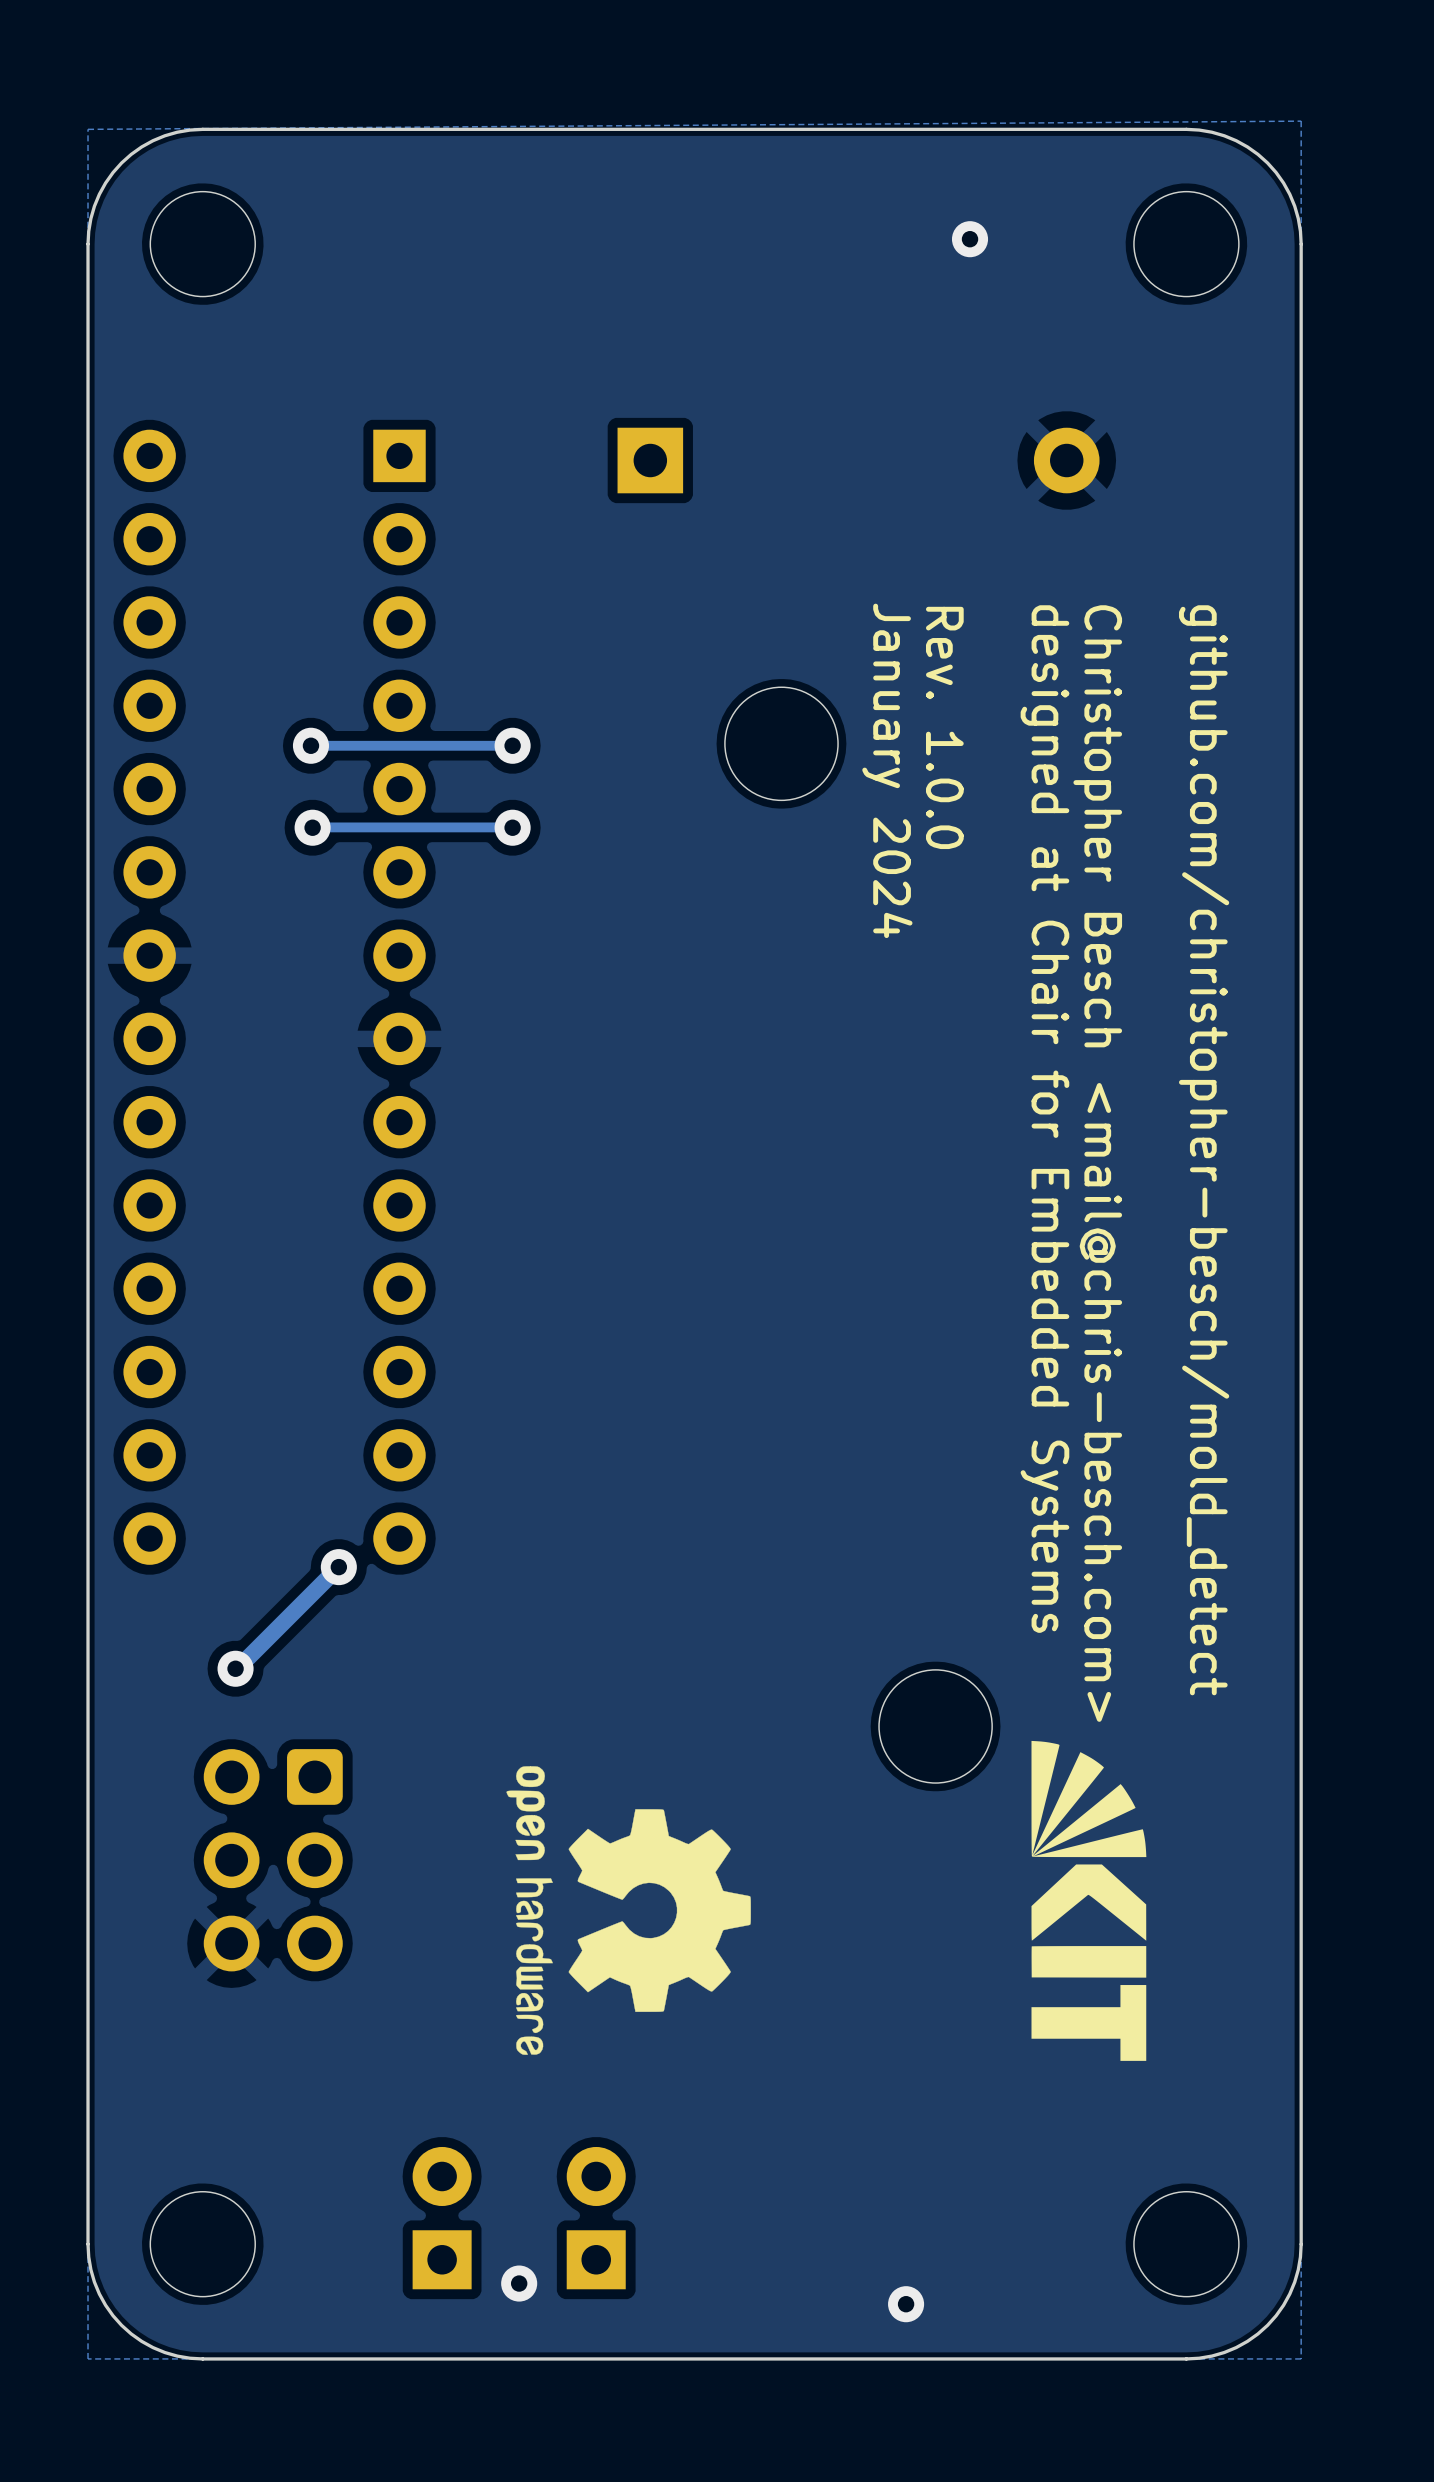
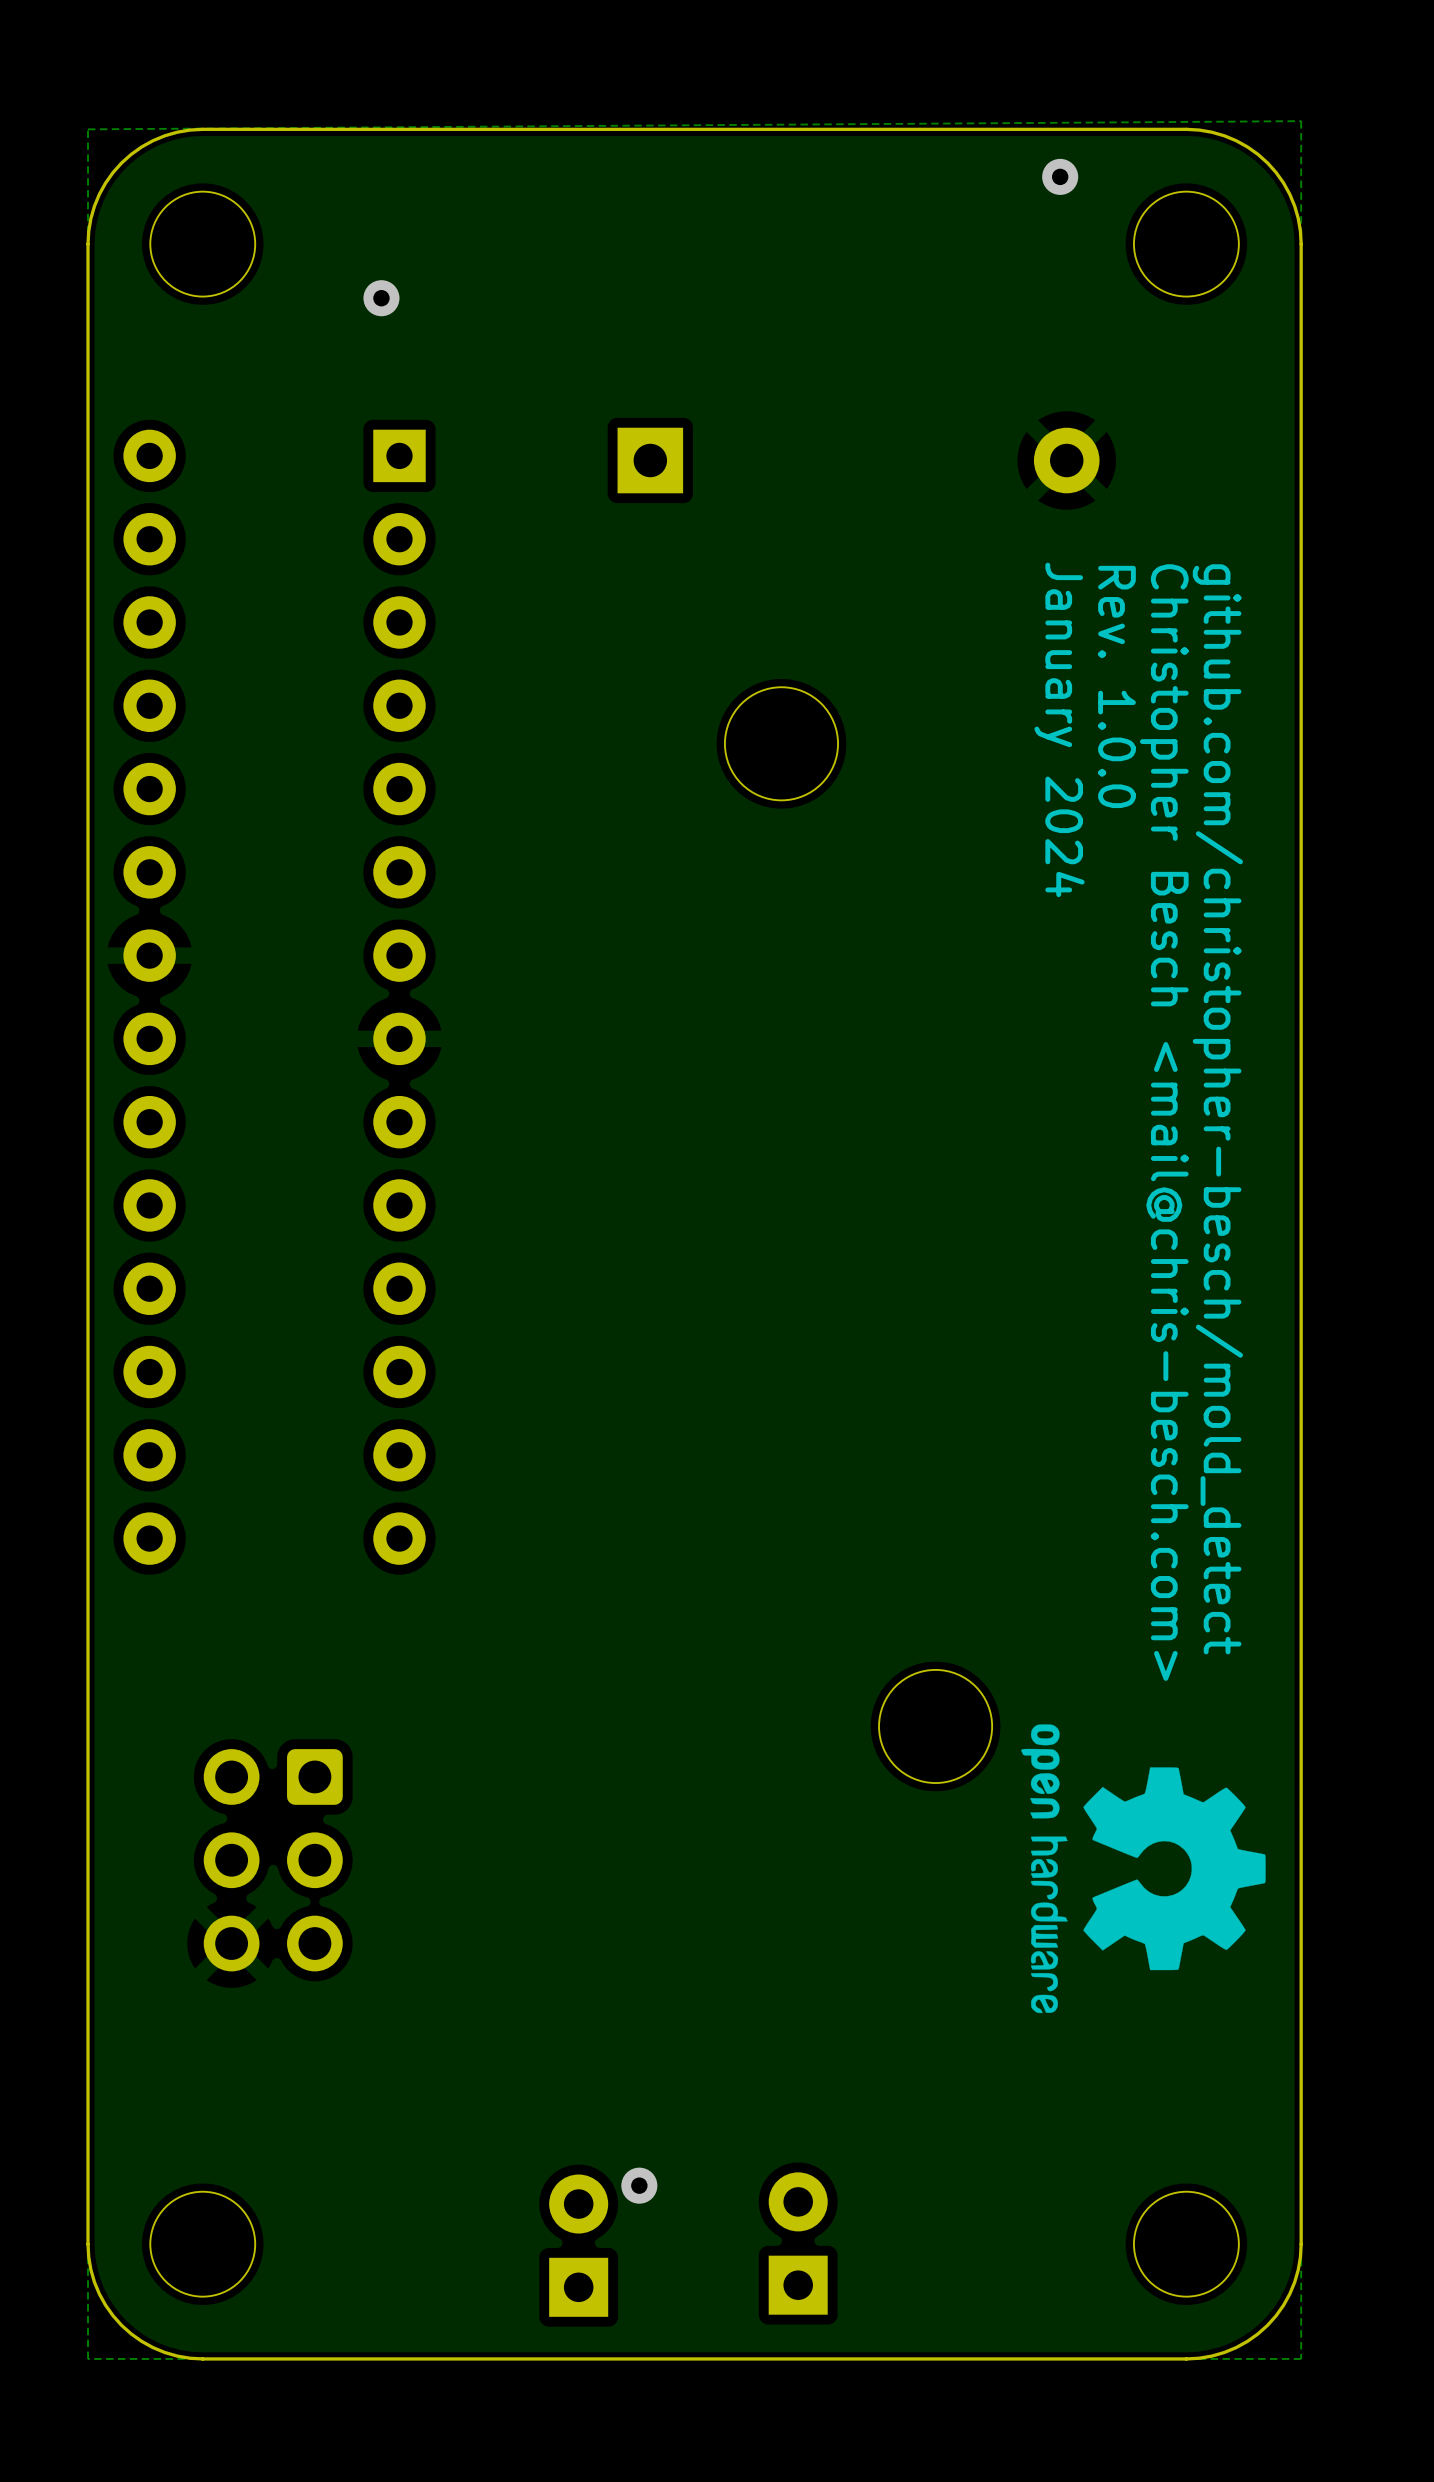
via position: (970, 239) -> (1060, 176)
via: none -> (381, 298)
text position: Rev. 1.0.0 (944, 727) -> Rev. 1.0.0 (1116, 686)
via: (310, 745) -> none
track: (512, 745) (310, 745) -> none
via: (512, 745) -> none
text position: January 2024 (887, 770) -> January 2024 (1059, 729)
via: (312, 827) -> none
track: (512, 827) (312, 827) -> none
via: (512, 827) -> none
text: designed at Chair for Embedded Systems (1044, 1119) -> none
text position: github.com/christopher-besch/mold_detect (1204, 1150) -> github.com/christopher-besch/mold_detect (1217, 1109)
text position: Christopher Besch <mail@chris-besch.com> (1097, 1163) -> Christopher Besch <mail@chris-besch.com> (1164, 1122)
track: (338, 1567) (235, 1668) -> none
via: (338, 1567) -> none
via: (235, 1668) -> none
drawing: [1031, 1740, 1147, 2061] -> none
drawing position: (628, 1910) -> (1143, 1868)
via: none -> (639, 2185)
part position: (442, 2218) -> (798, 2243)
part position: (596, 2218) -> (578, 2245)
via: (519, 2283) -> none
via: (906, 2304) -> none

